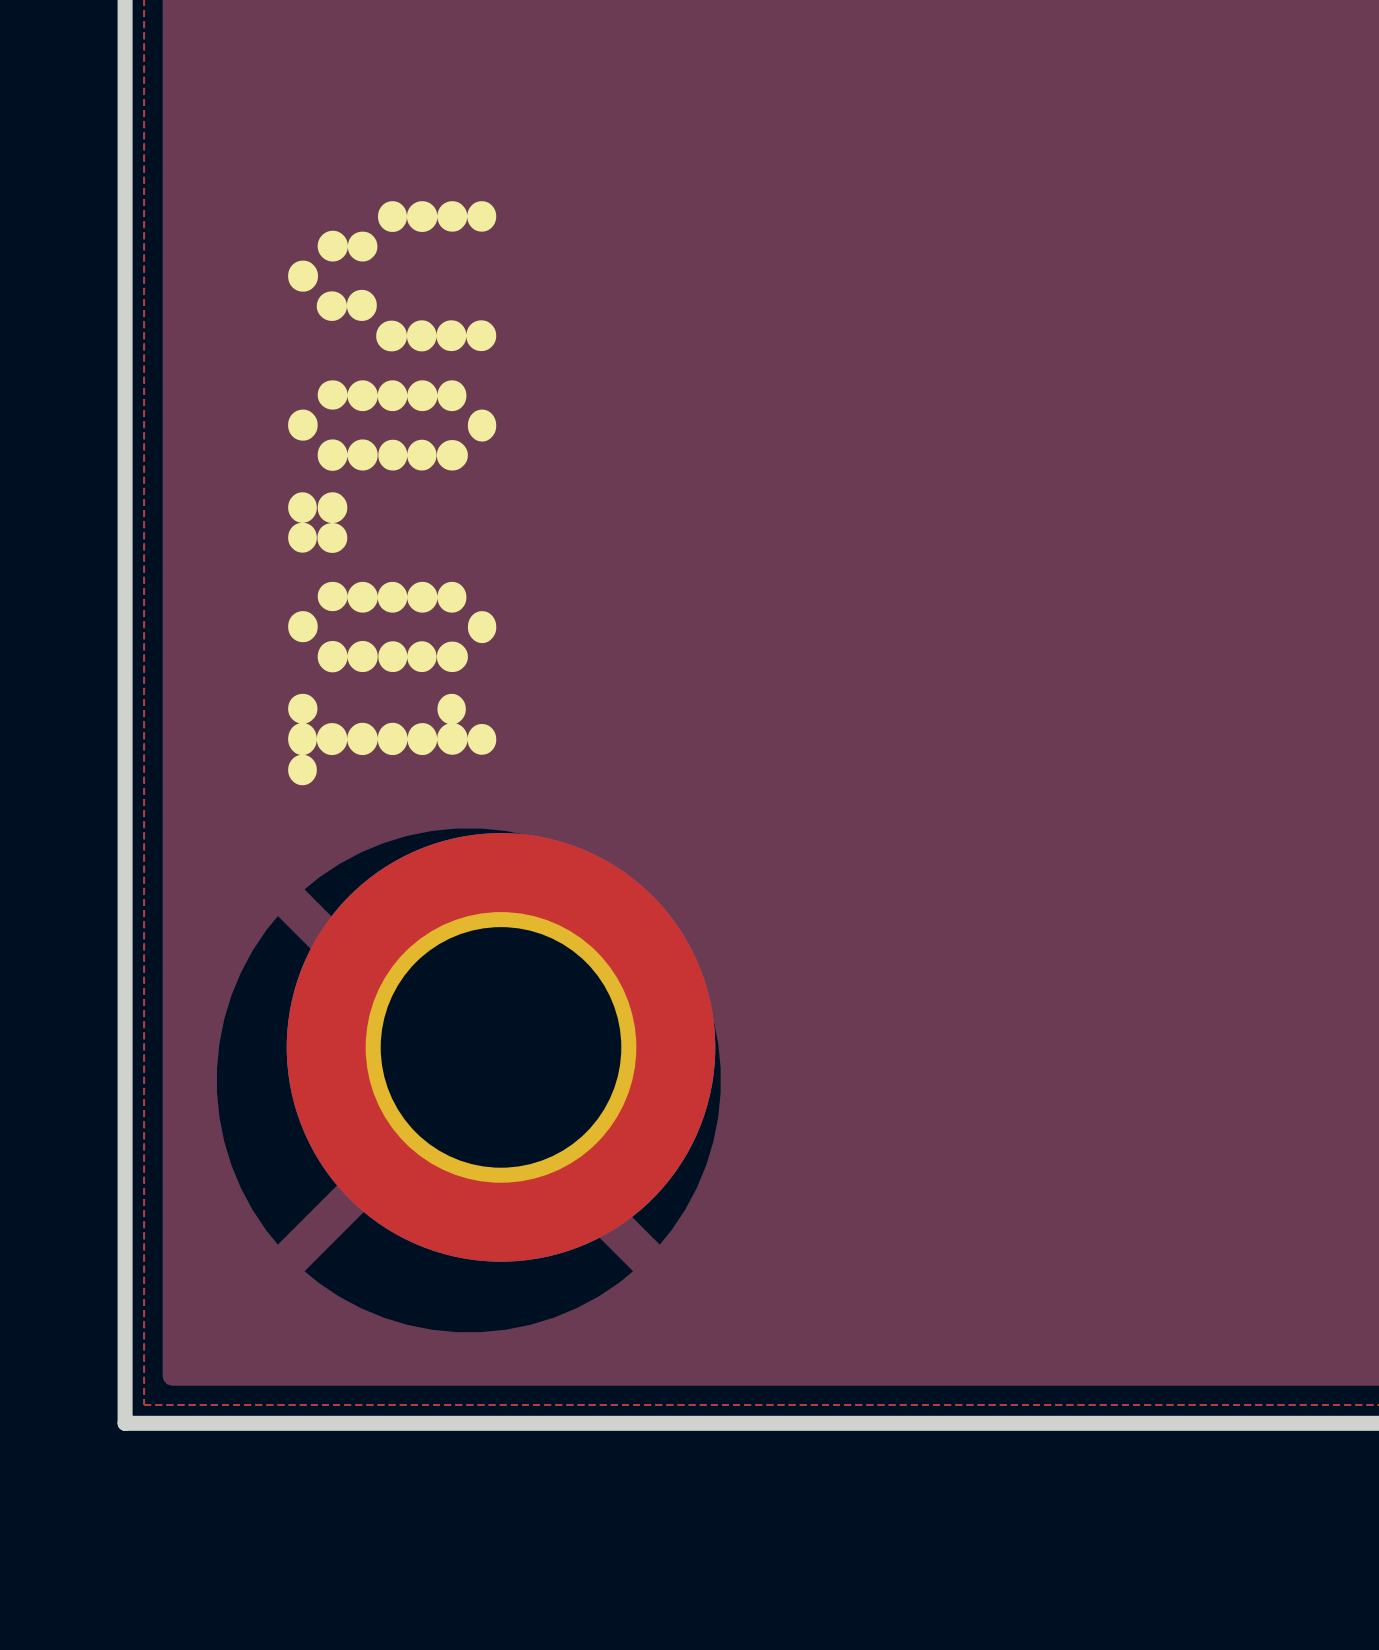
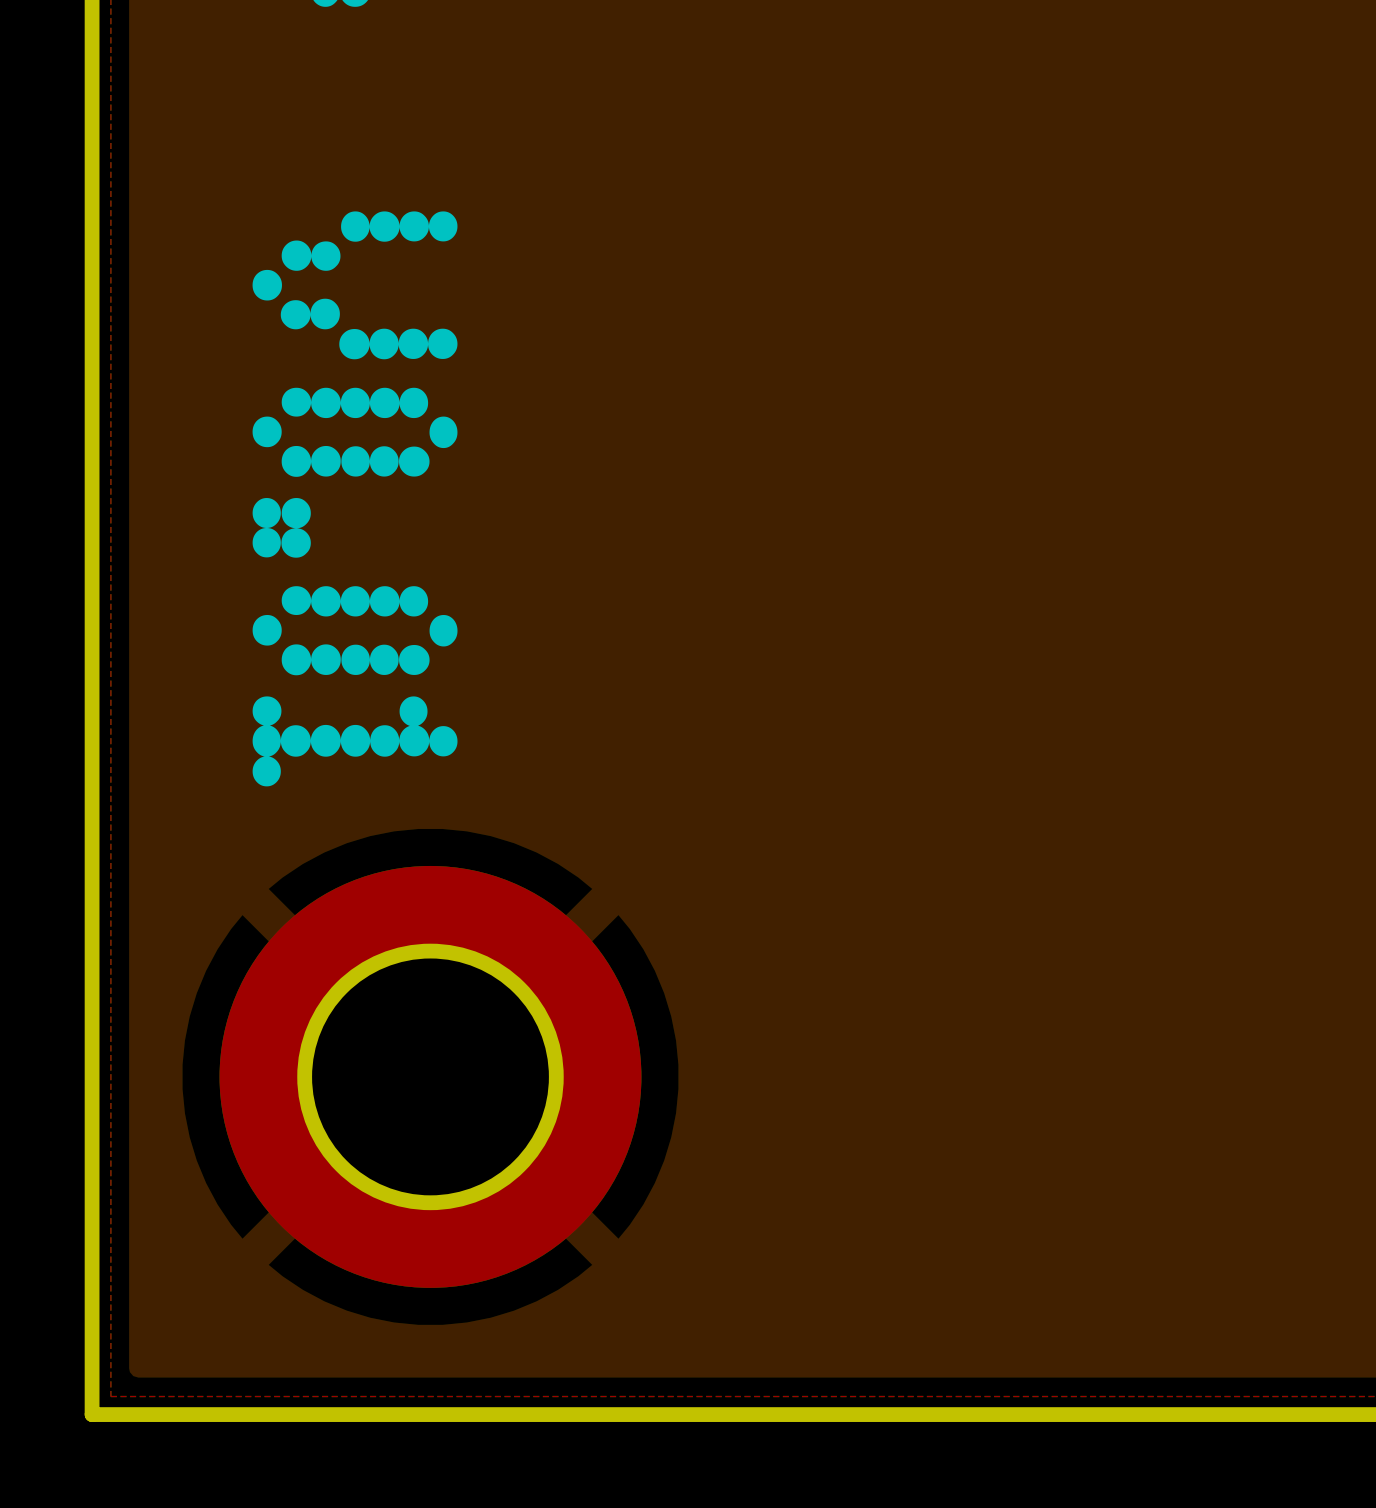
part position: (501, 1047) -> (430, 1076)

